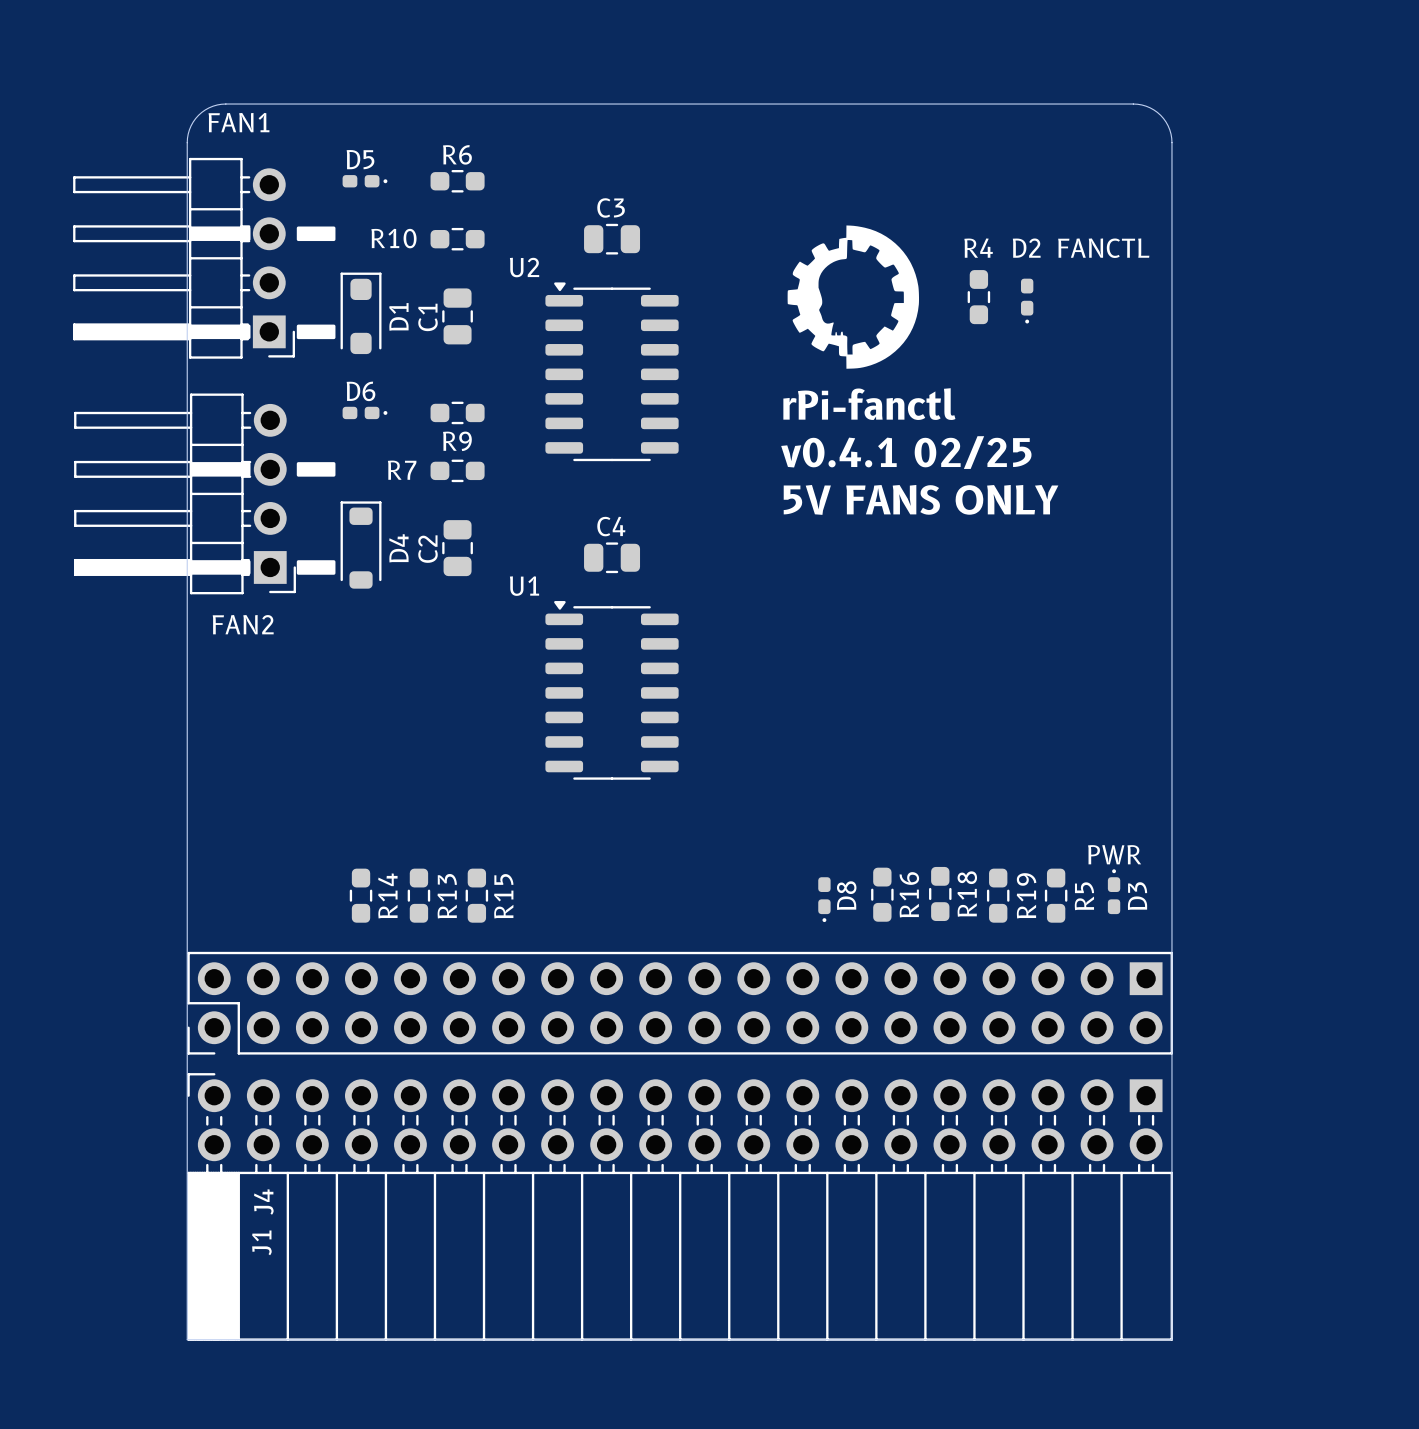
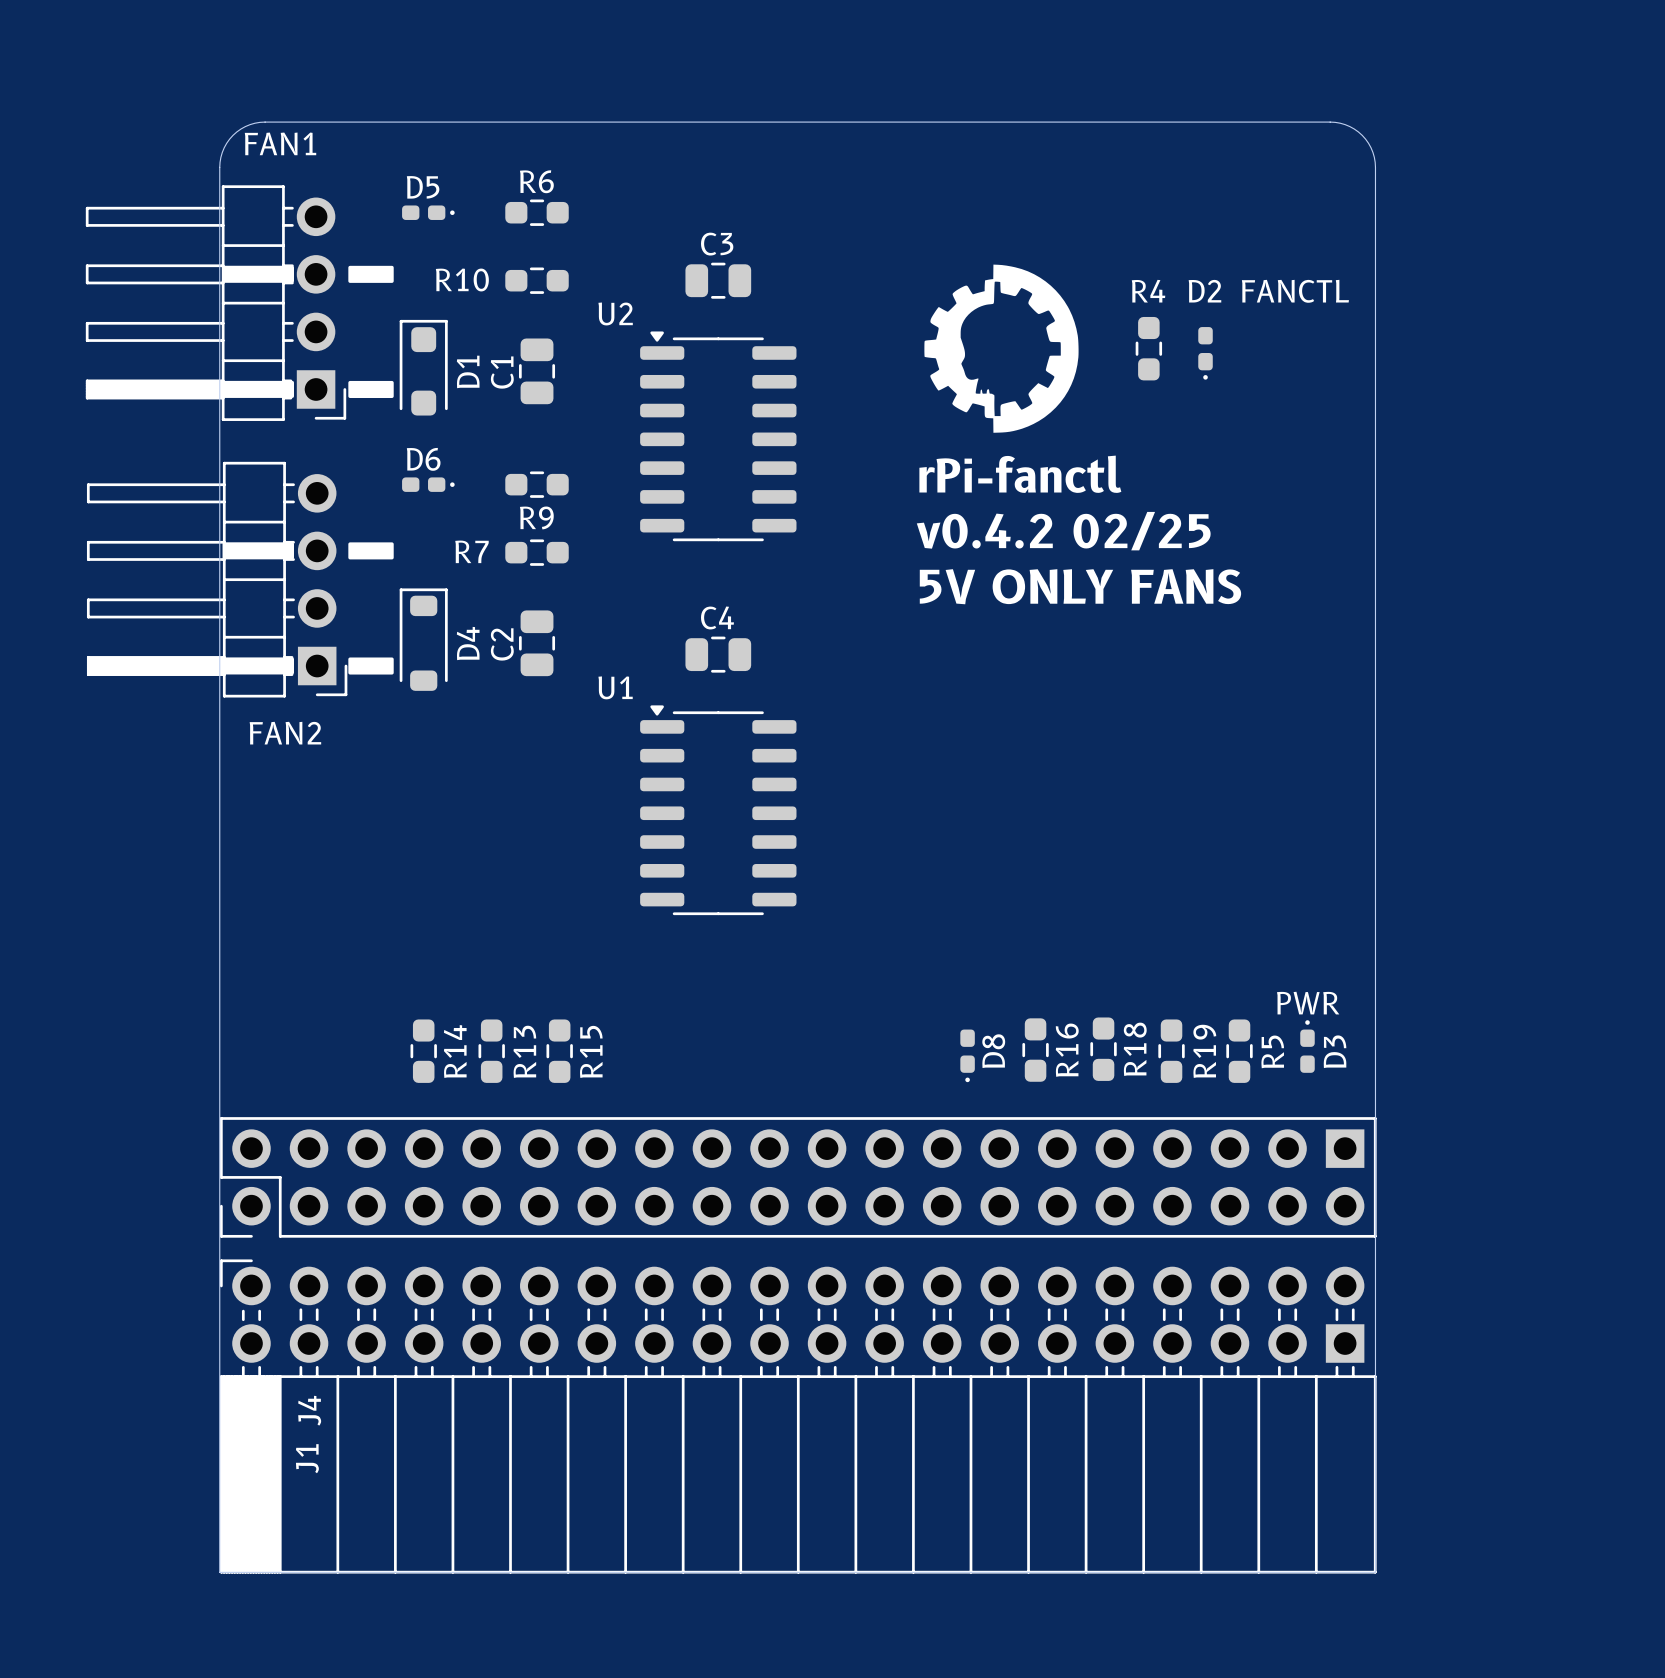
text: v0.4.1 02/25 (906, 452) -> v0.4.2 02/25 (1063, 531)
text: 5V FANS ONLY (921, 499) -> 5V ONLY FANS (1080, 586)
J1 footprint: [187, 1073, 1173, 1341] -> [219, 1259, 1377, 1574]

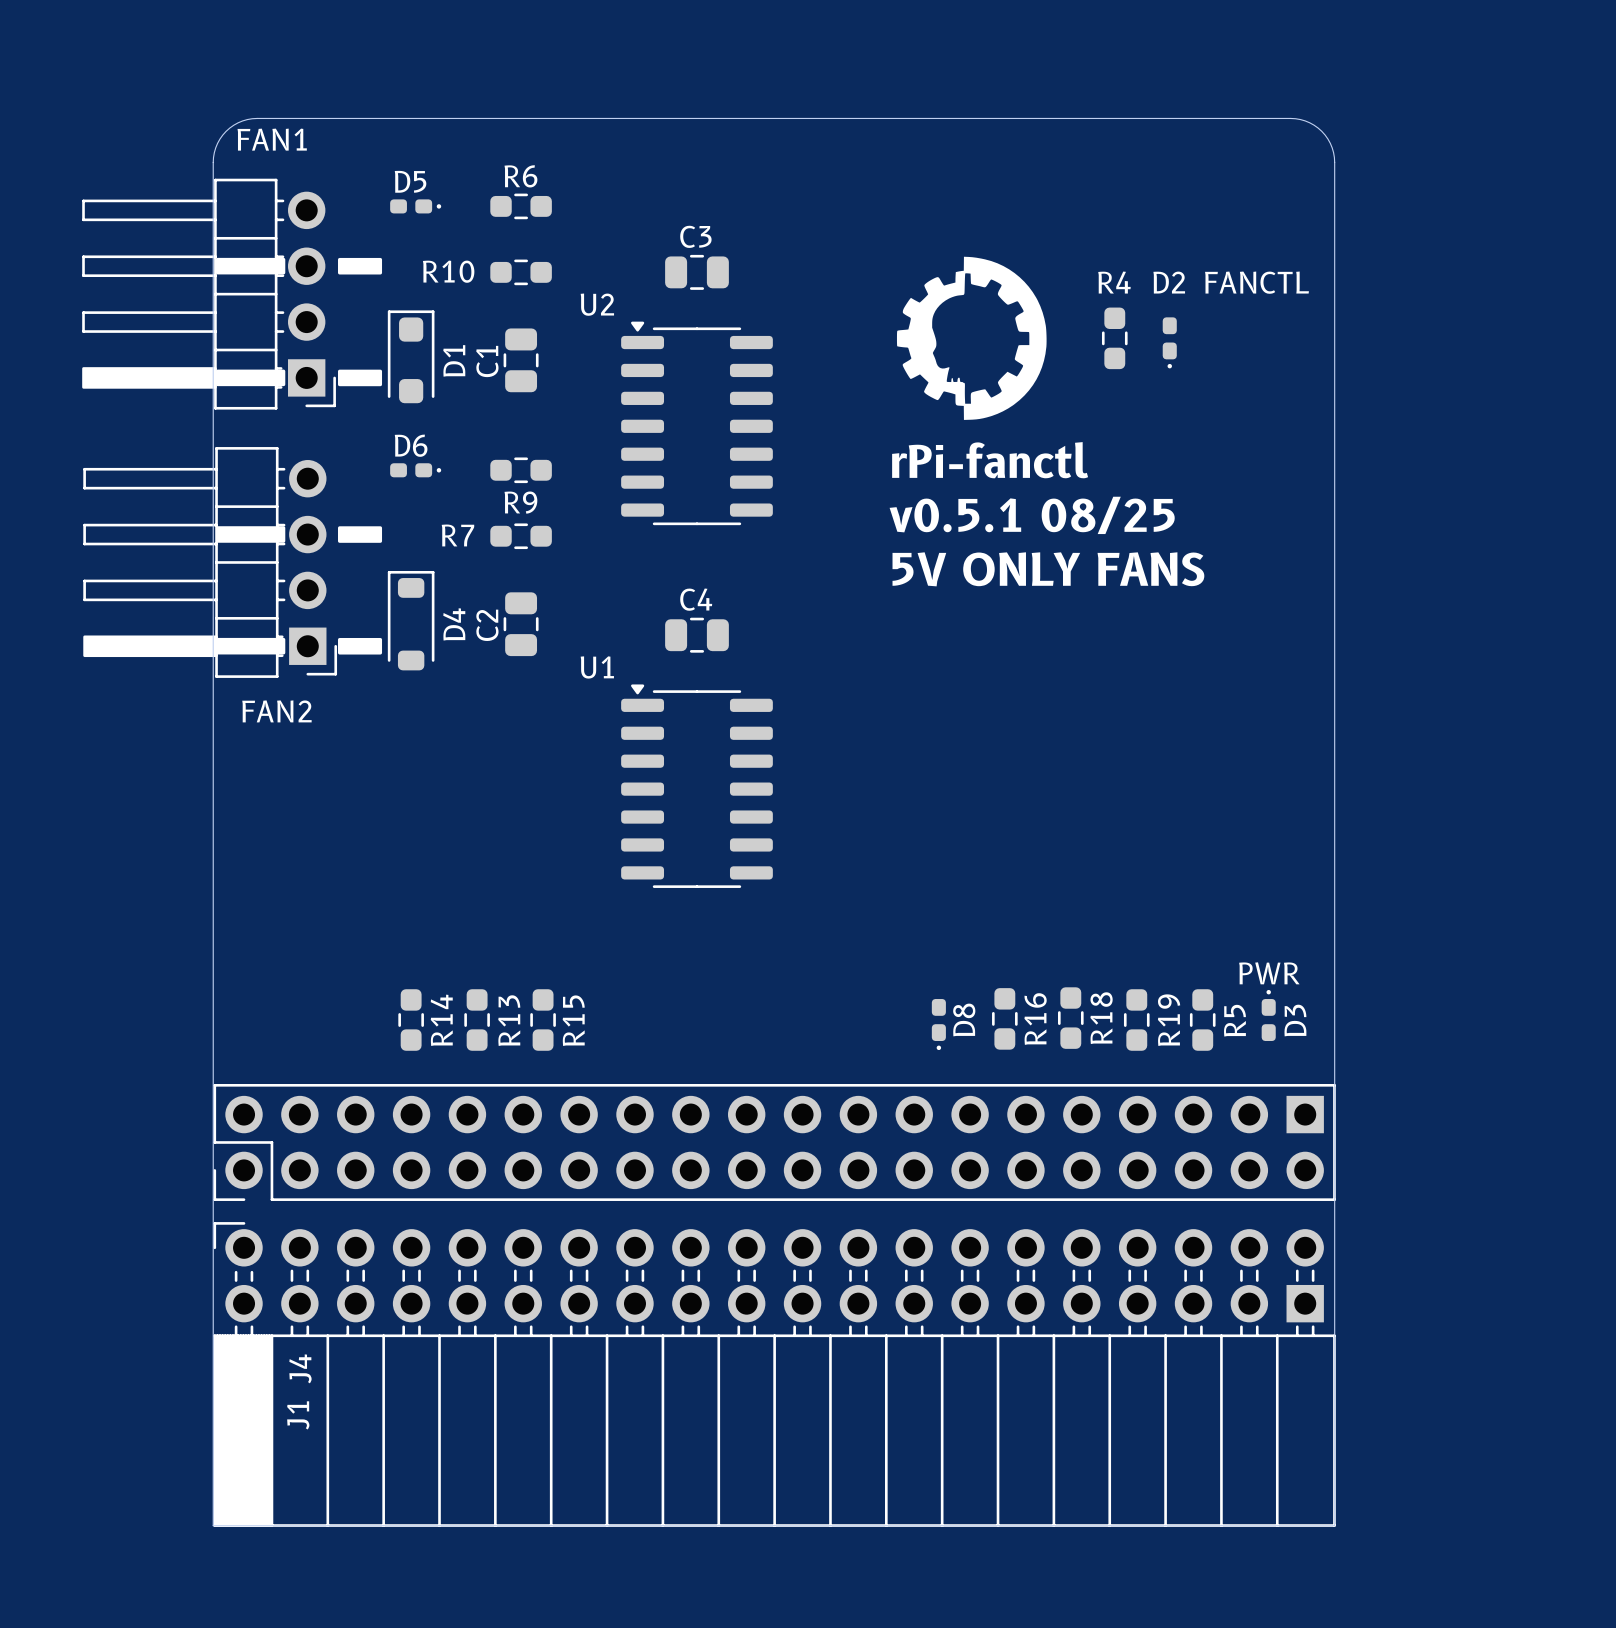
FAN1 footprint: [85, 185, 347, 421] -> [82, 178, 336, 410]
FAN2 footprint: [86, 461, 348, 698] -> [83, 447, 338, 678]
text: v0.4.2 02/25 (1063, 531) -> v0.5.1 08/25 (1032, 515)

